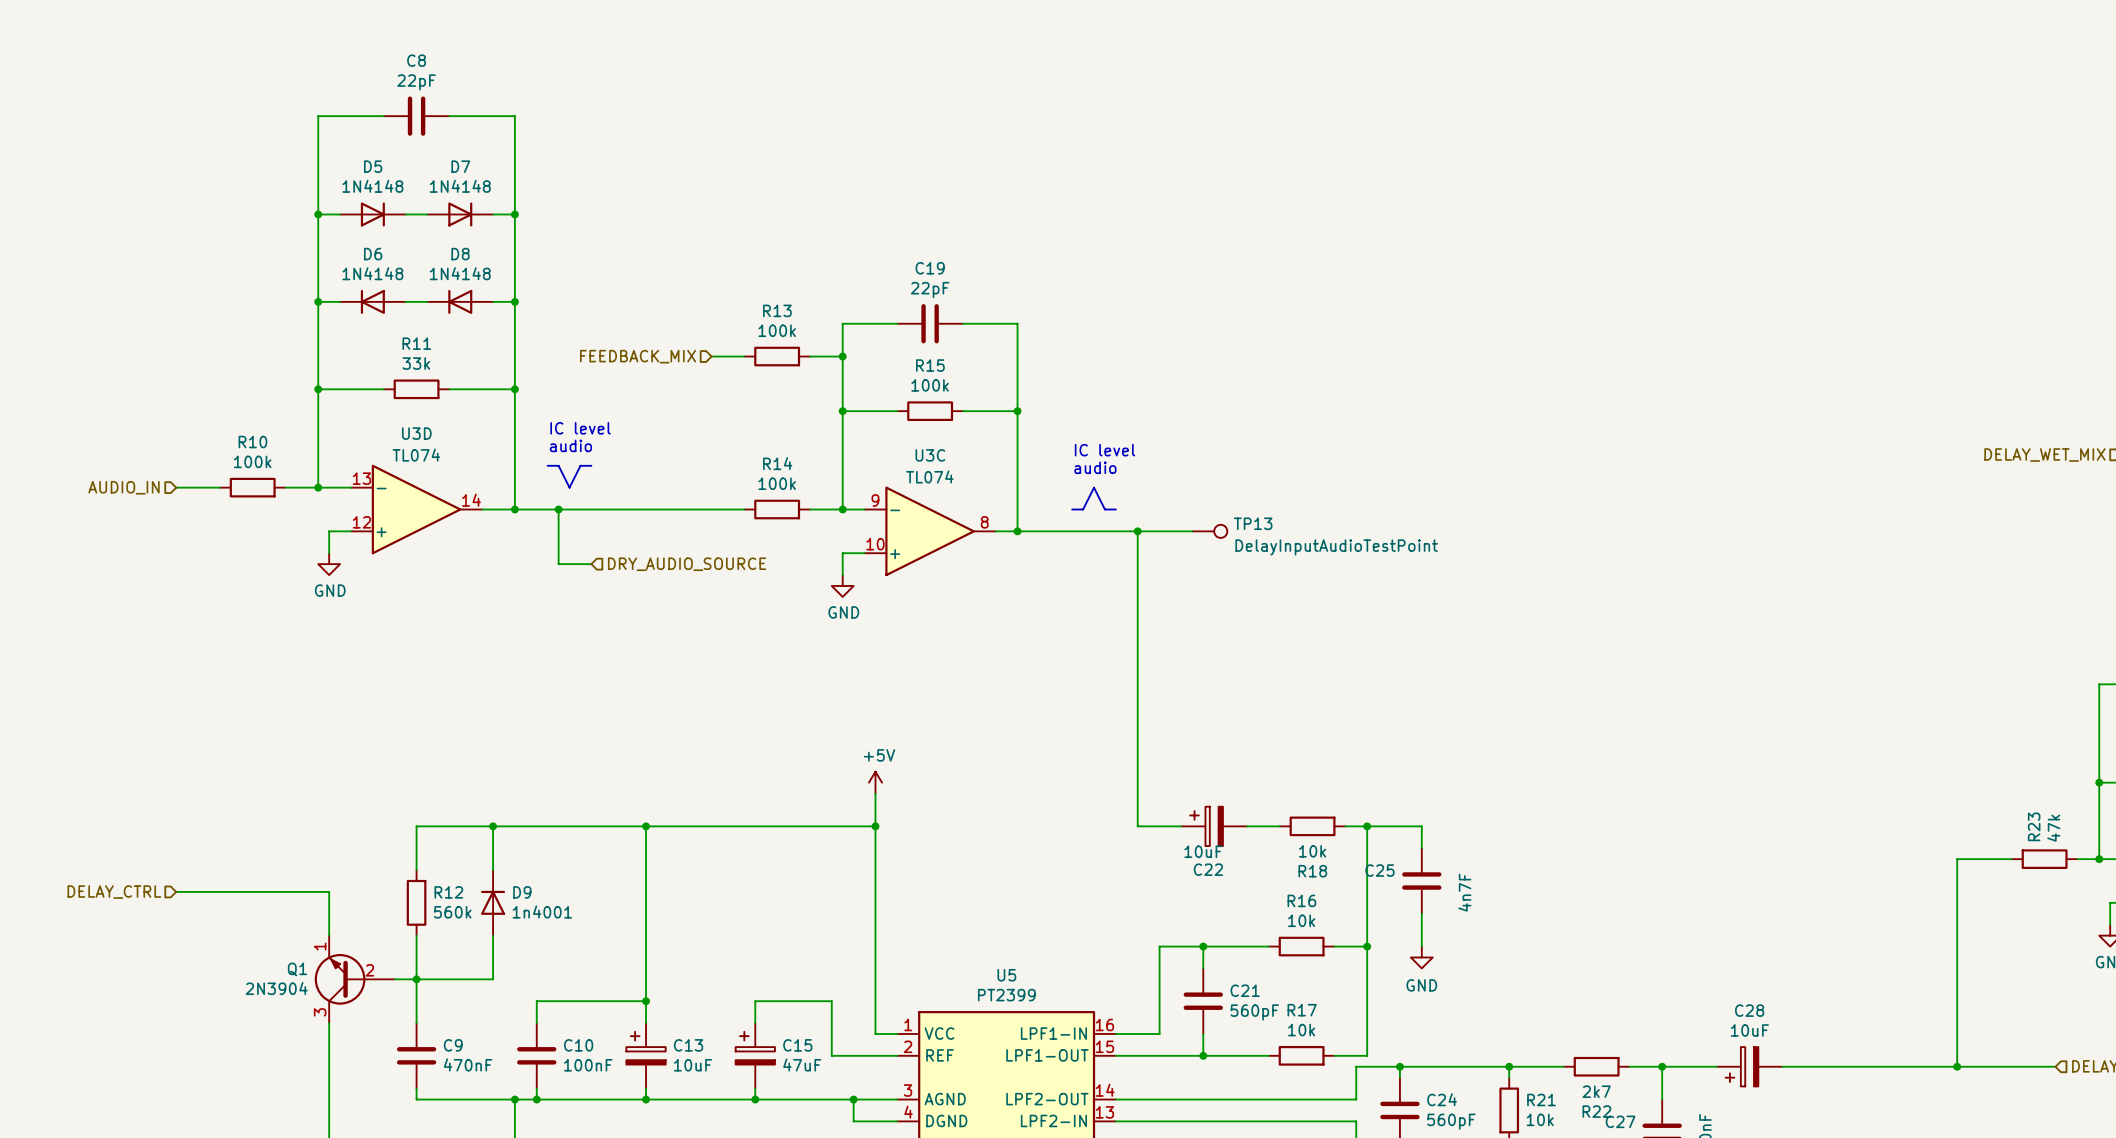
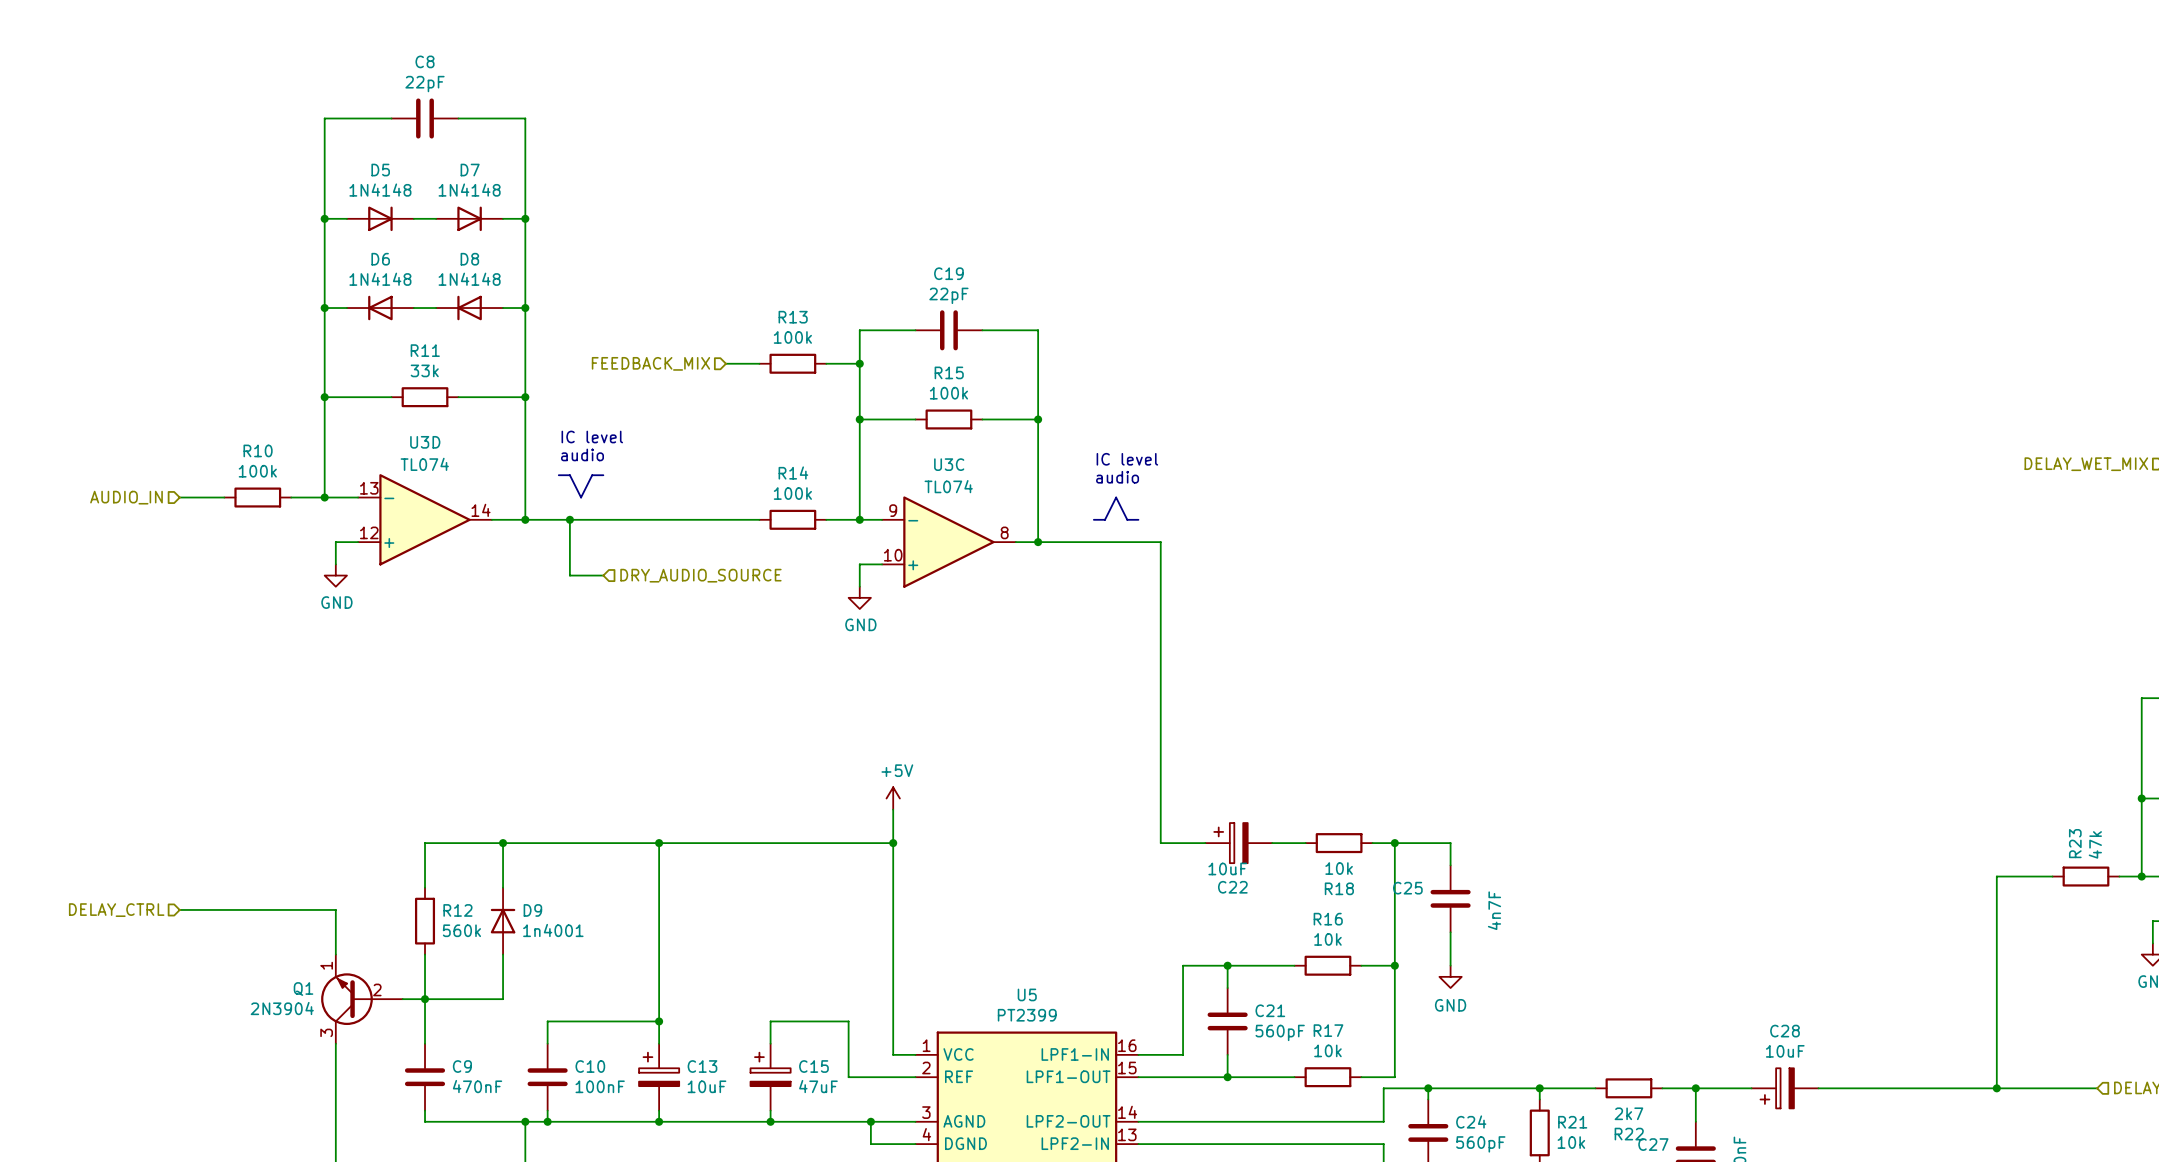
wire: (1137, 531) (1192, 531) -> none
junction: (1137, 531) -> none
TP13: DelayInputAudioTestPoint (1209, 531) -> none

